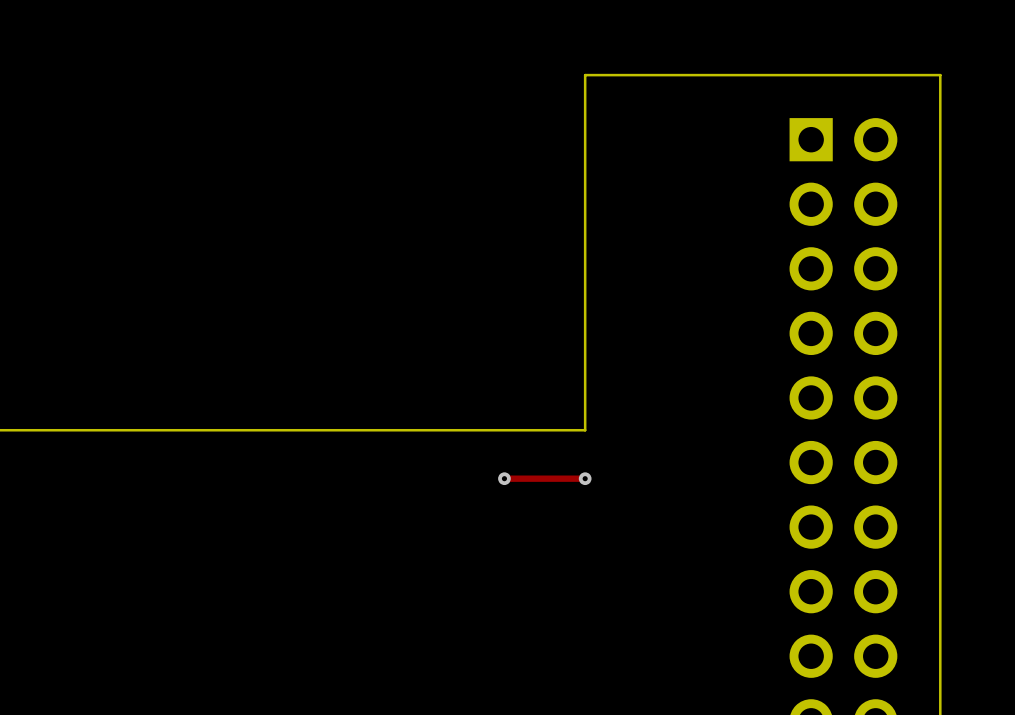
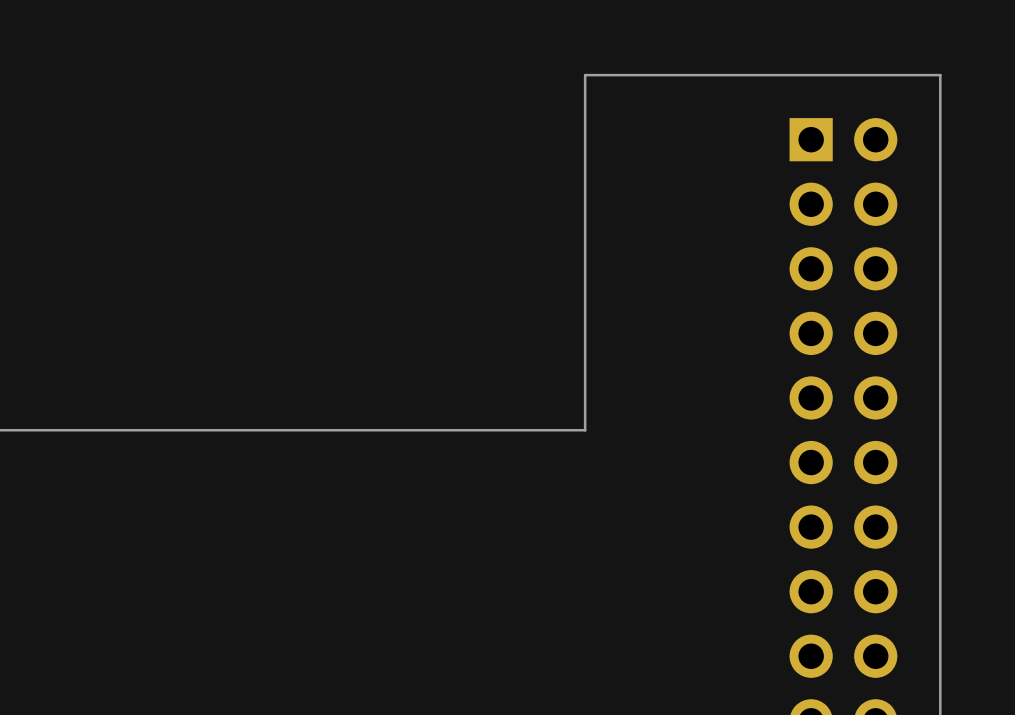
track: (504, 478) (585, 478) -> none
via: (504, 478) -> none
via: (585, 478) -> none

